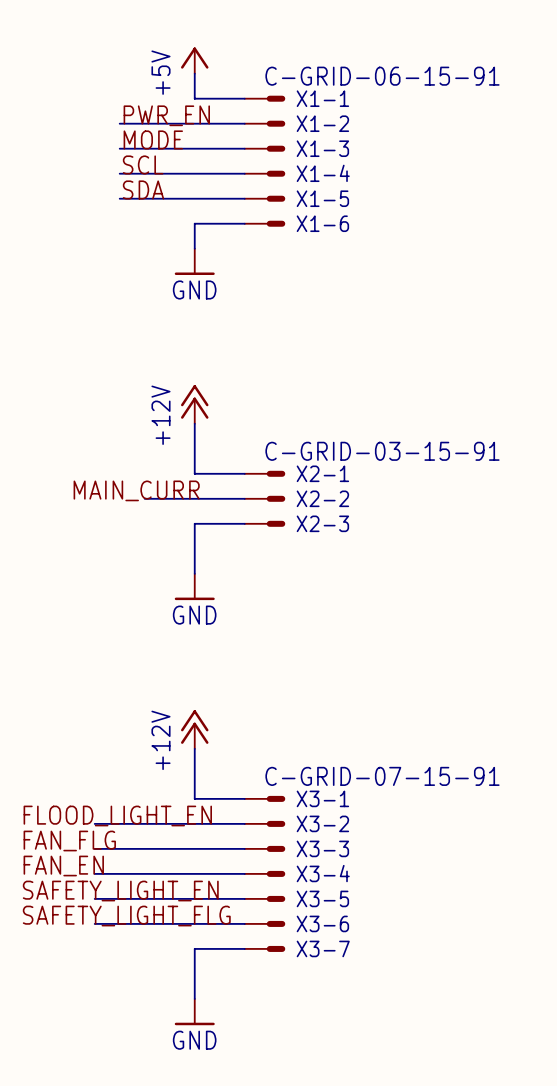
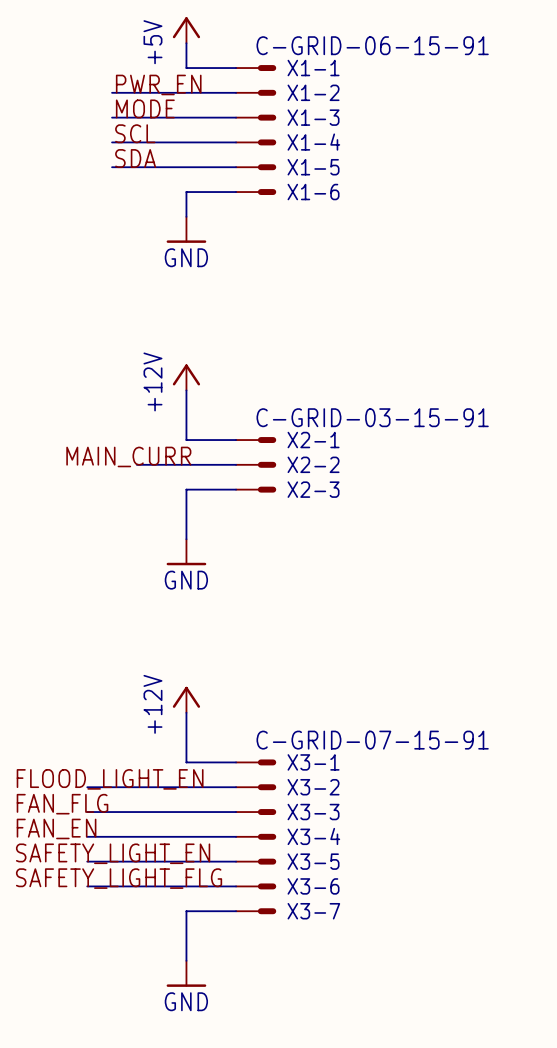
power symbol shape: [180, 385, 209, 424] -> [172, 364, 201, 391]
power symbol shape: [180, 710, 209, 749] -> [172, 686, 201, 713]

